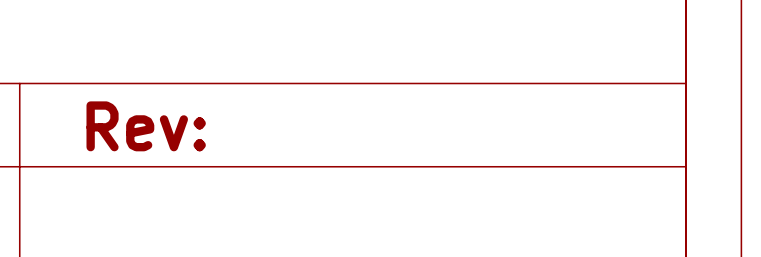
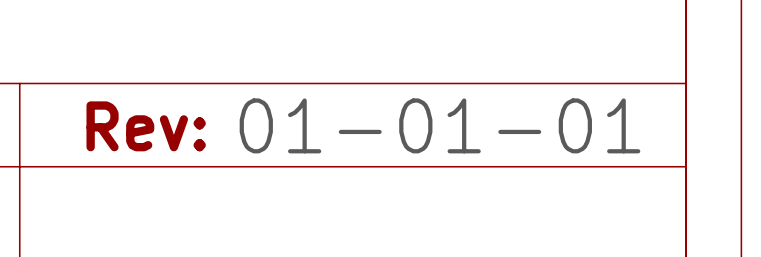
text: none -> 01-01-01 (439, 125)

